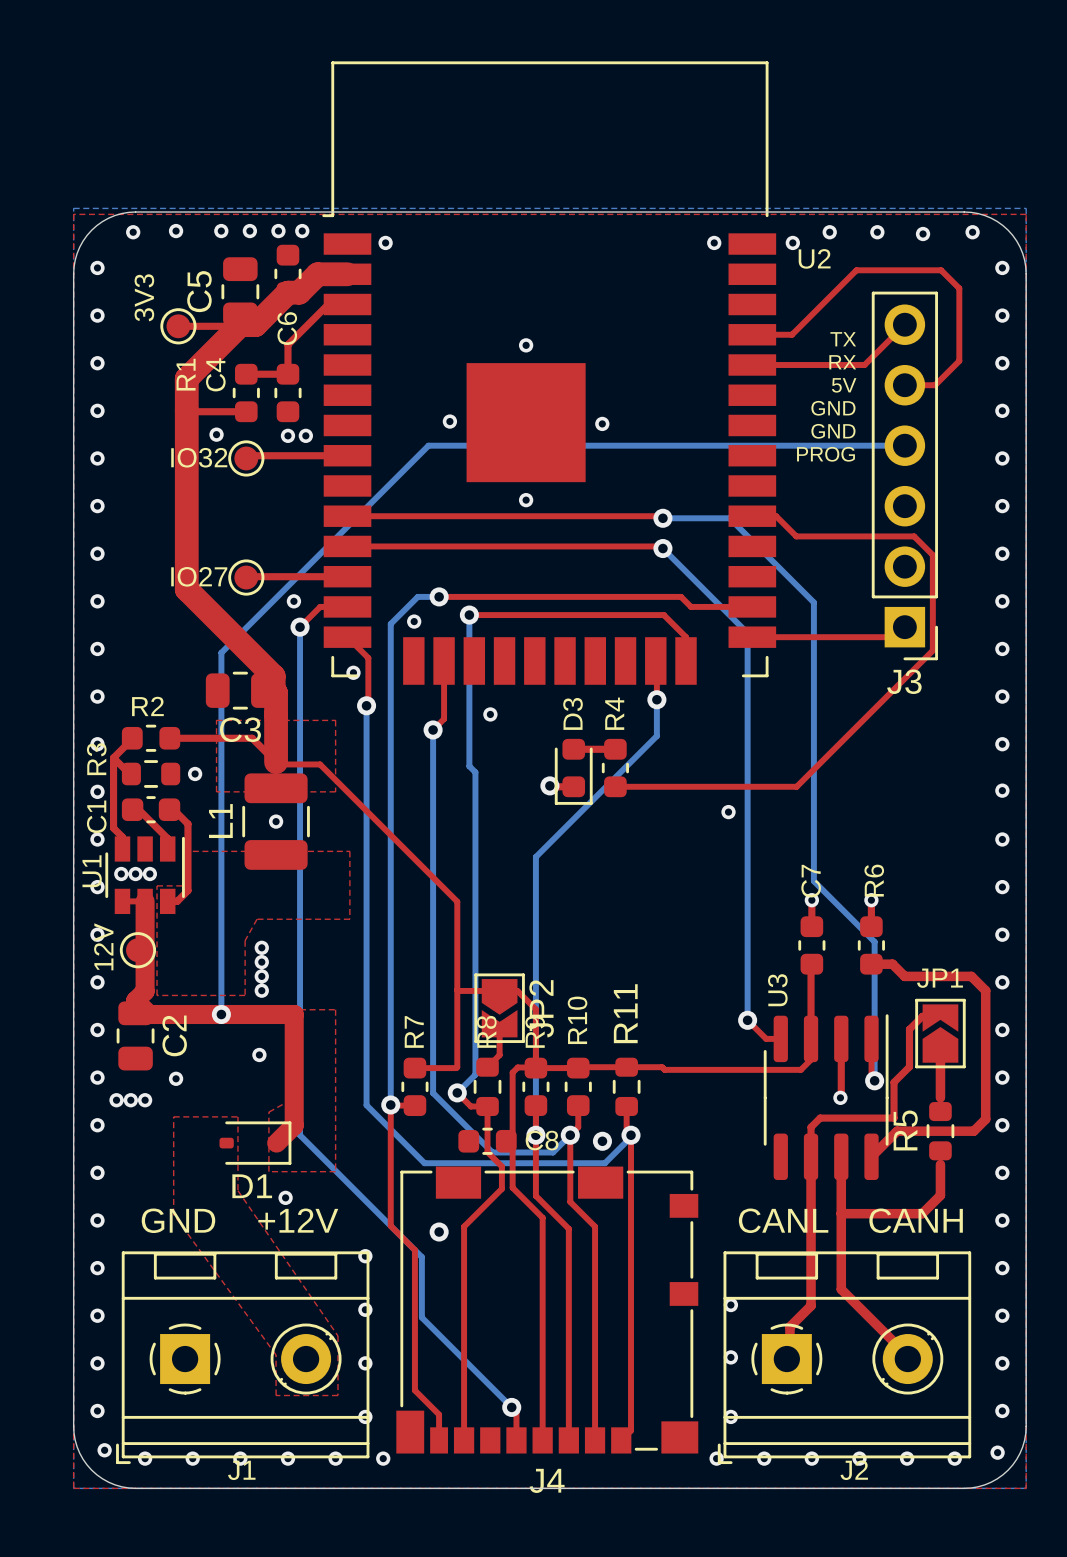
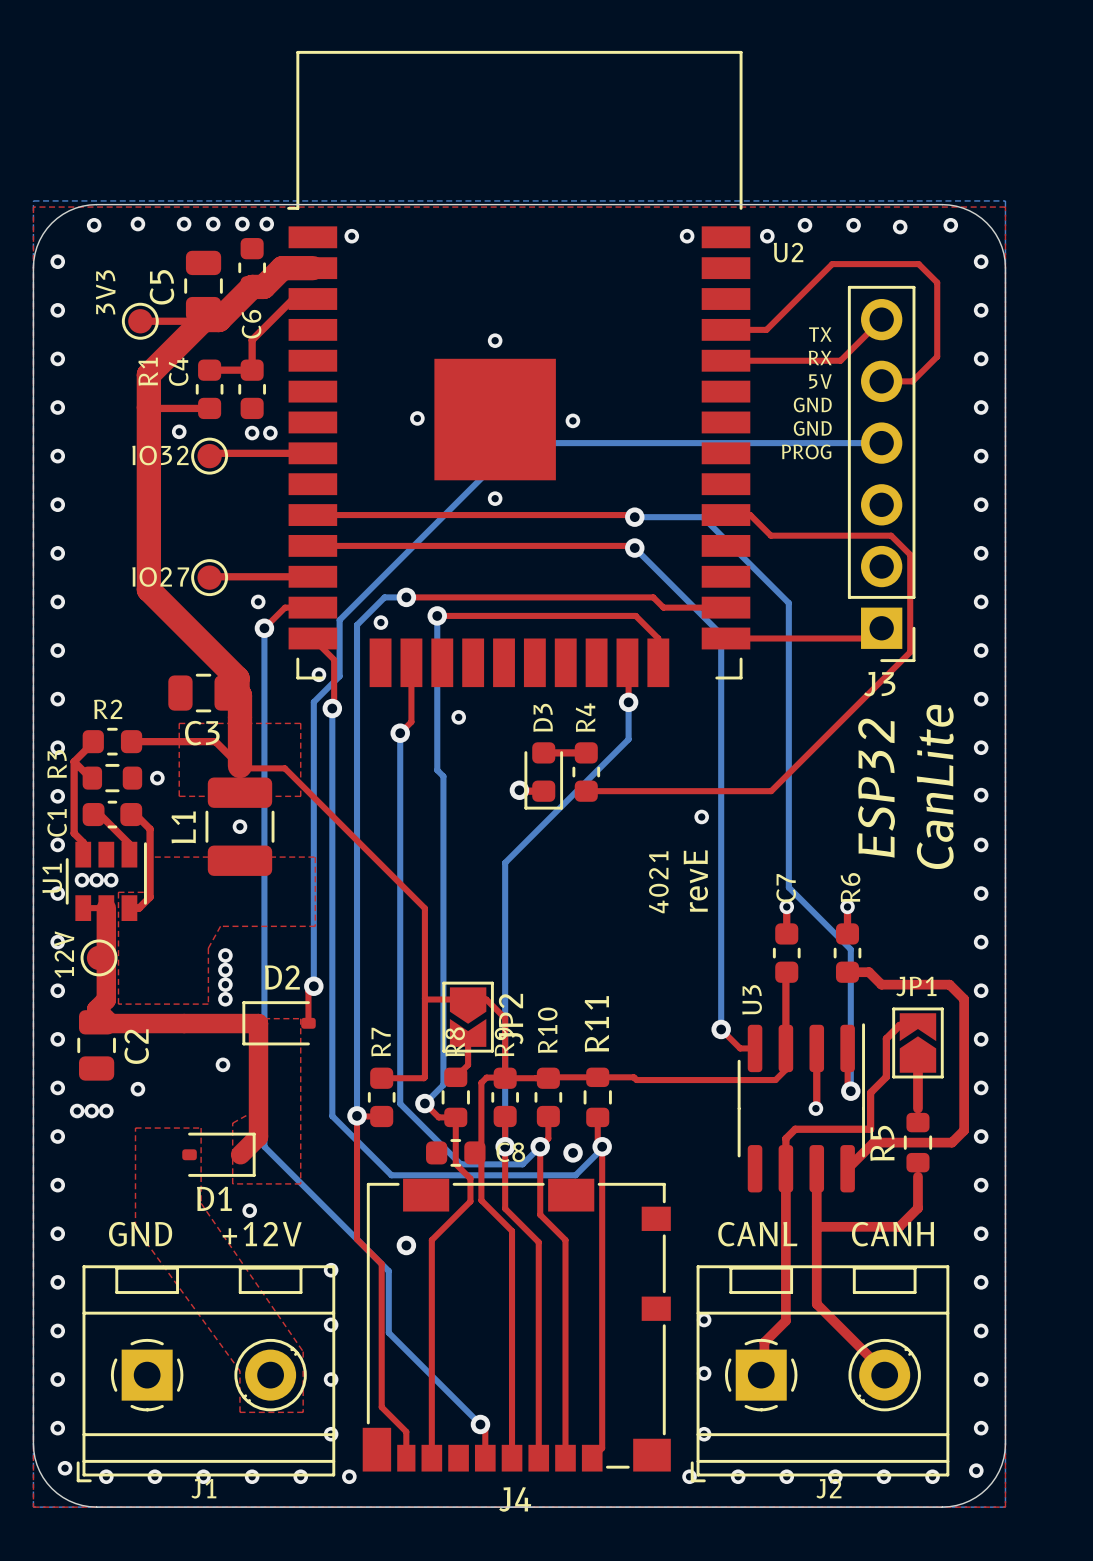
bottom track: (547, 445) (428, 445) (221, 652) (221, 1014) -> (516, 443) (339, 620) (339, 676) (313, 702) (313, 986)
text: none -> ESP32 (876, 788)
text: none -> CanLite (935, 786)
text: none -> revE (695, 880)
text: none -> 4021 (658, 882)
top track: none -> (313, 986) (308, 991) (308, 1023)
via position: (221, 1014) -> (313, 986)
D2: none -> (279, 1023)

